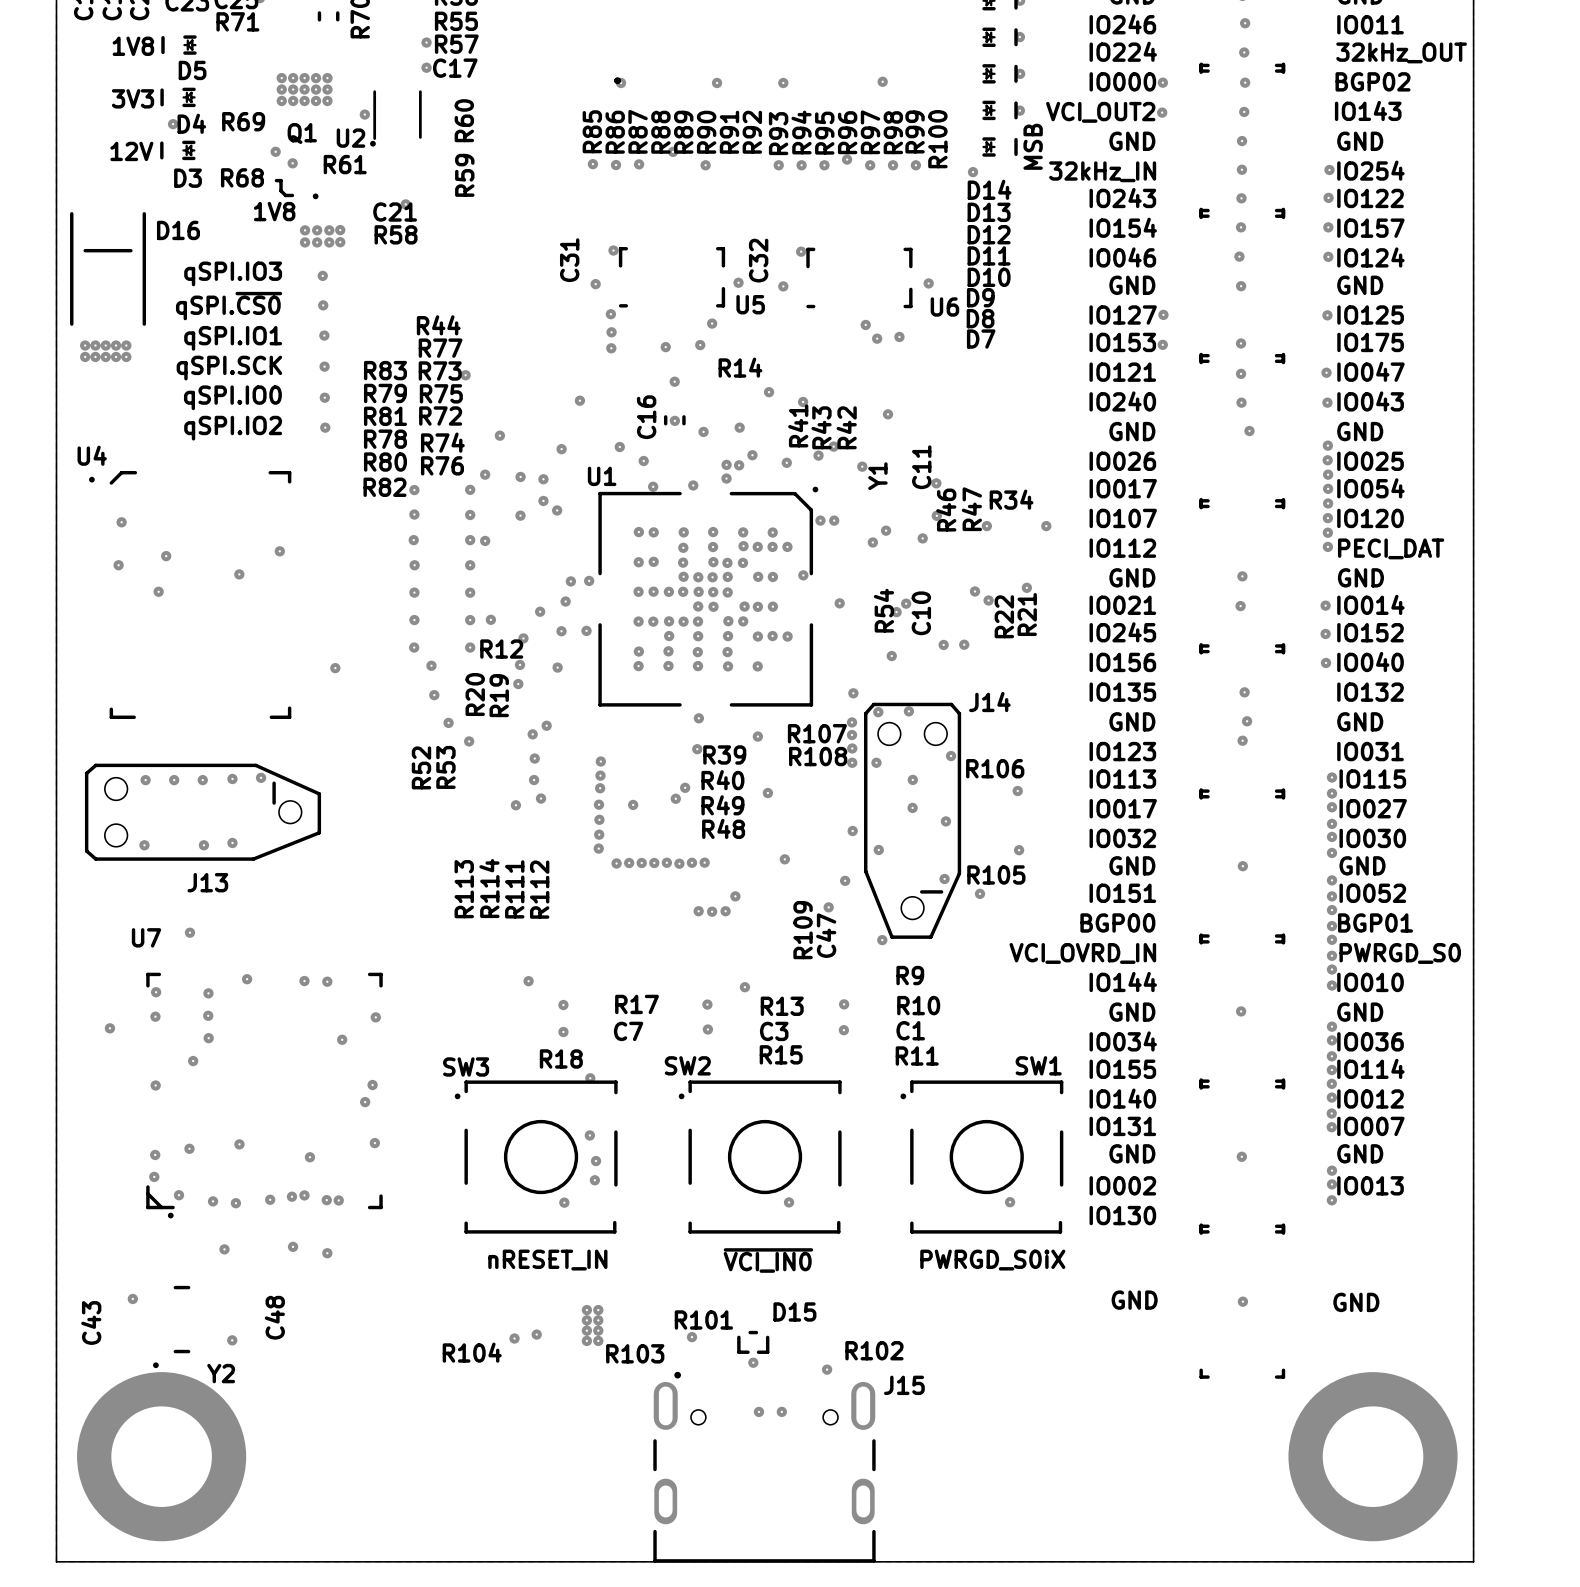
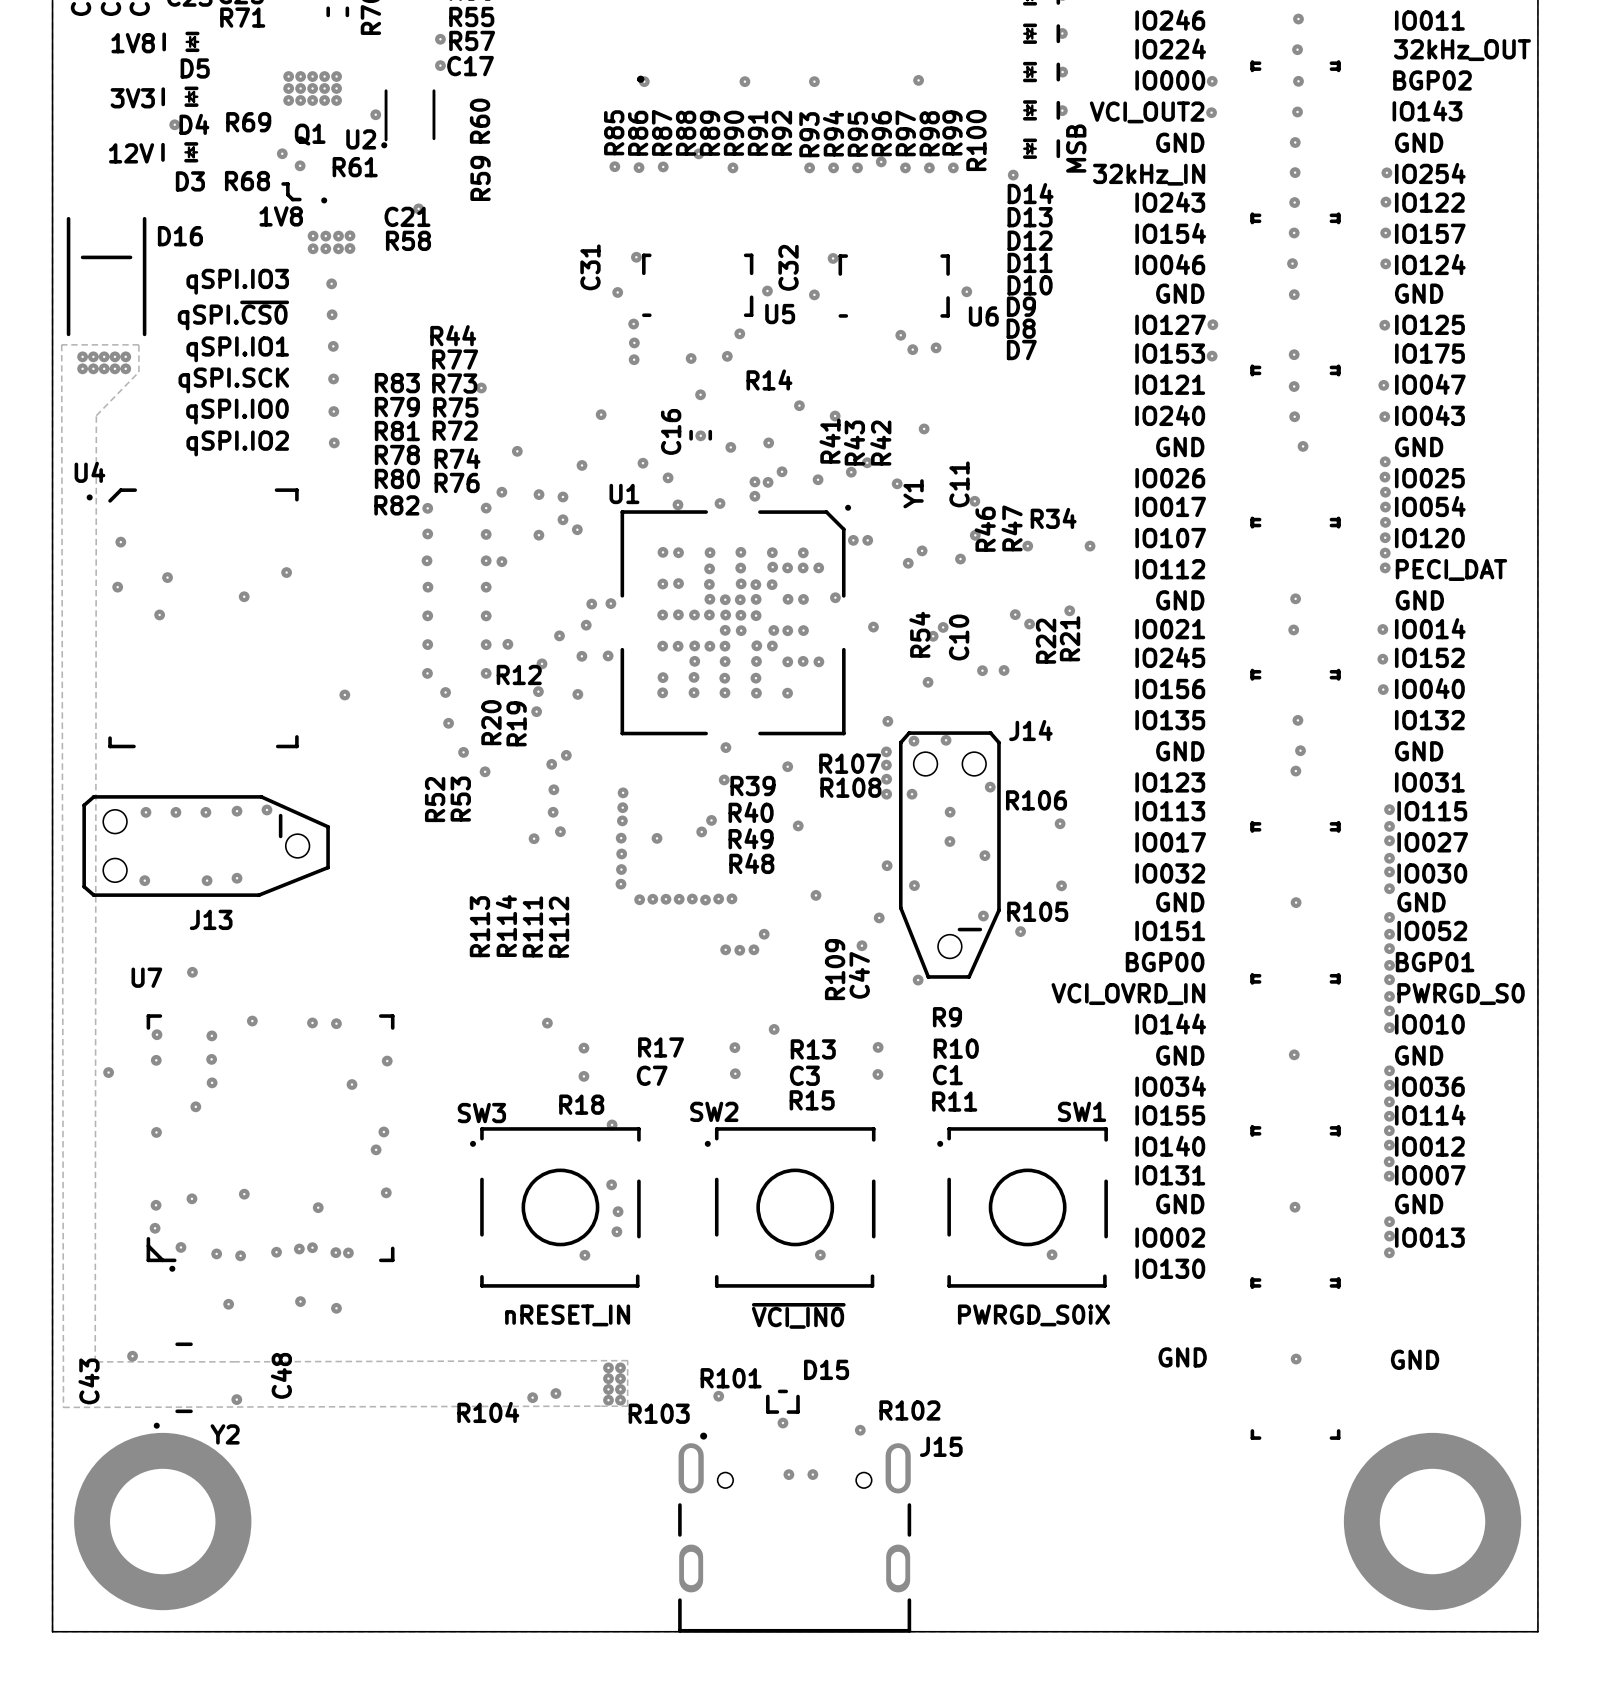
zone outline: none -> (61, 344) (138, 344) (138, 372) (96, 415) (95, 1361) (627, 1360) (627, 1406) (63, 1407) (61, 344)

